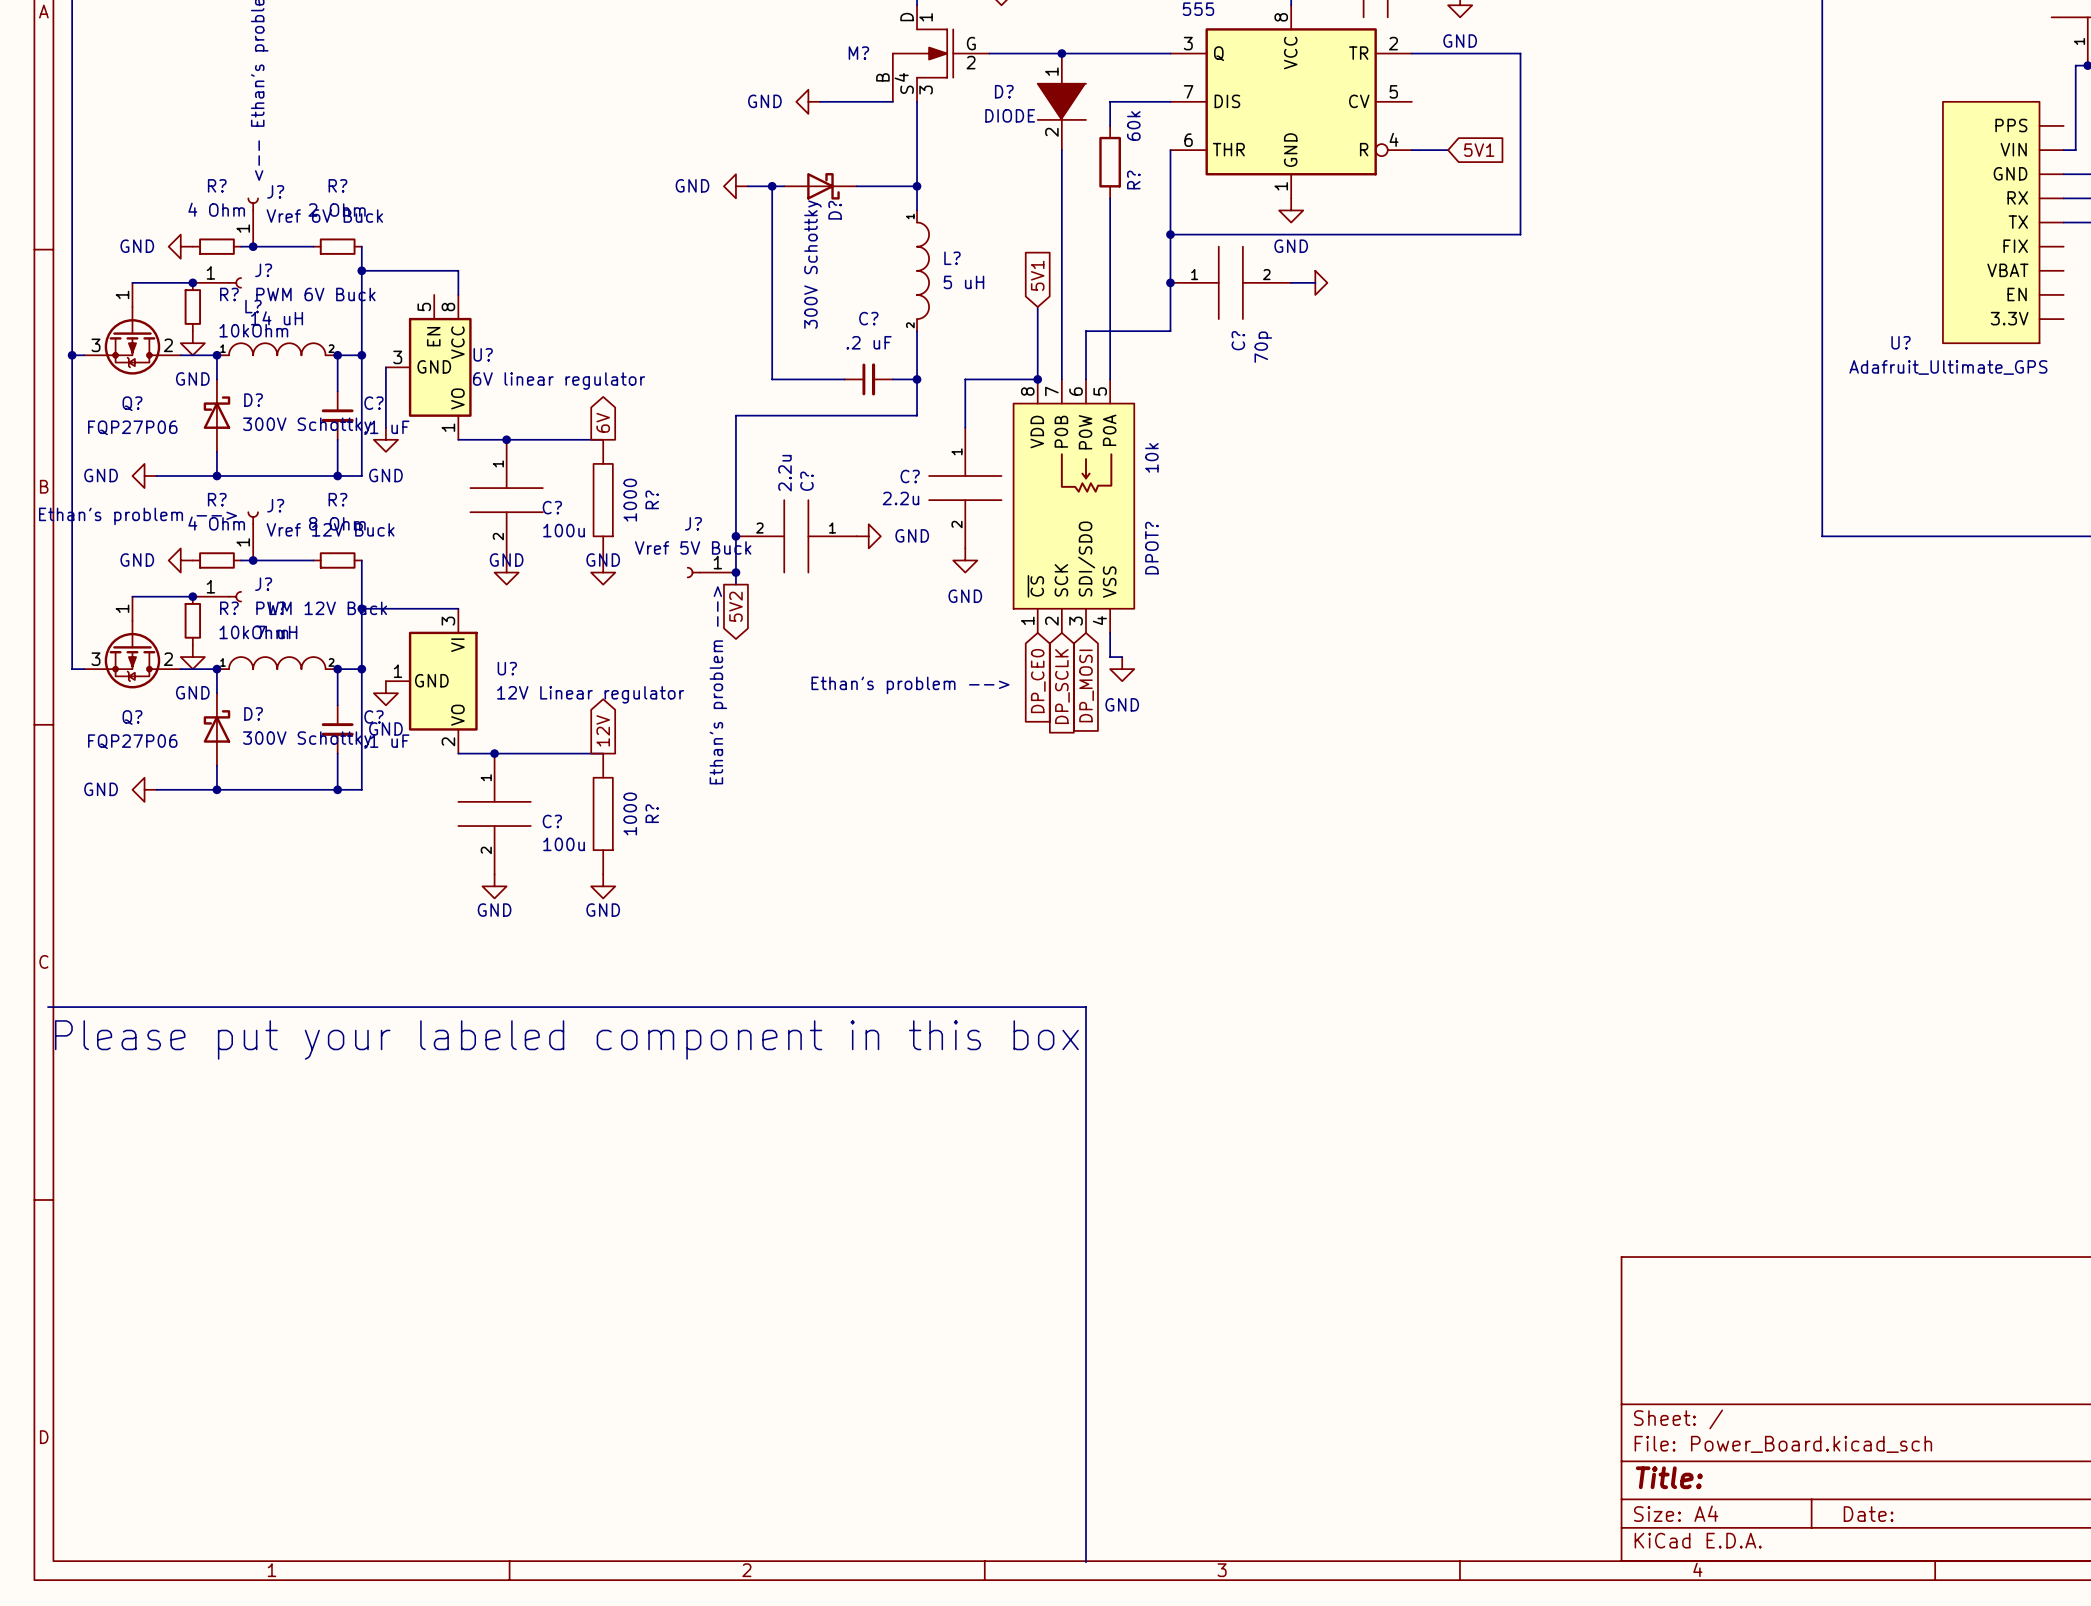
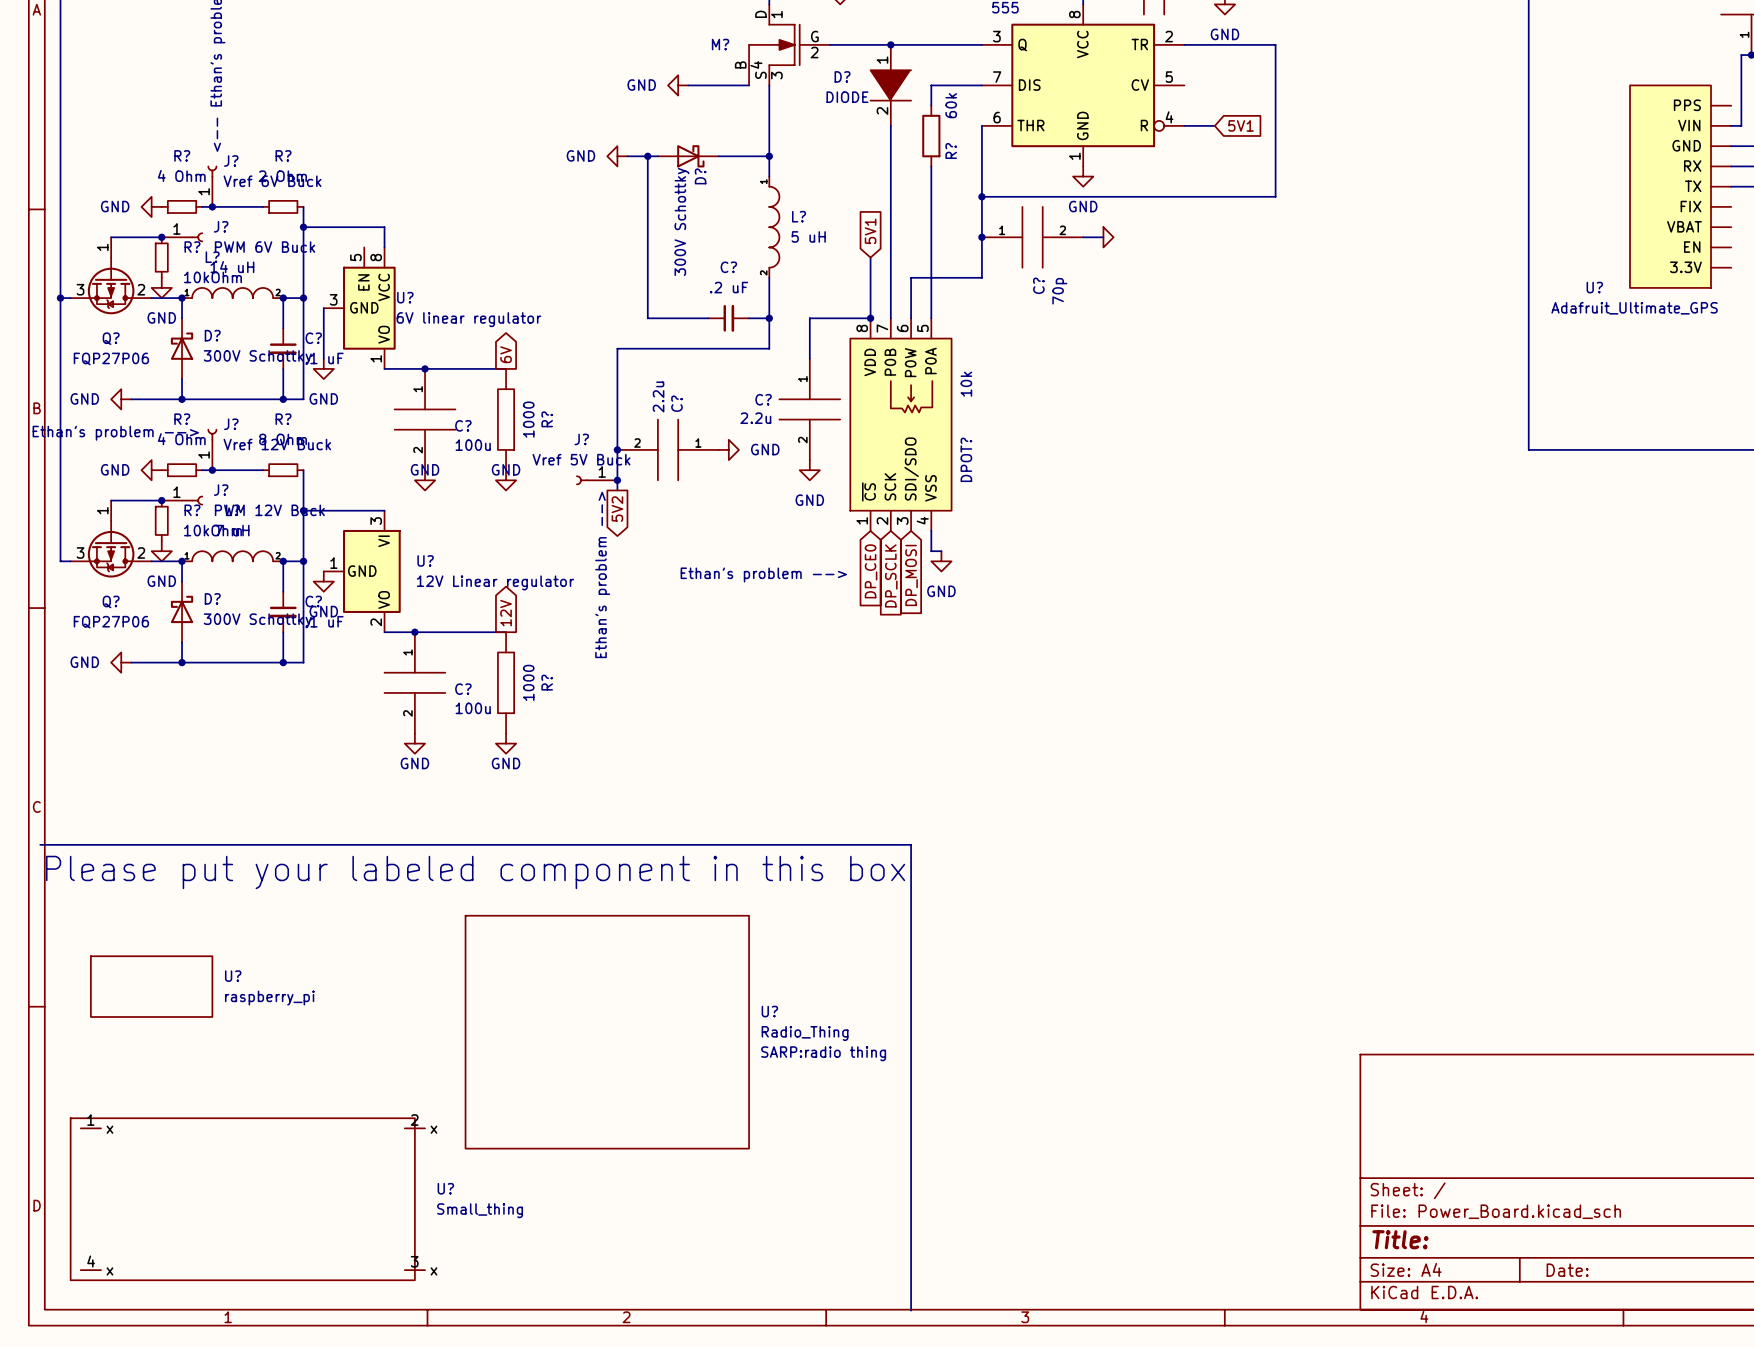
U?: none -> raspberry_pi (151, 986)
U?: none -> Radio_Thing (607, 1032)
U?: none -> Small_thing (247, 1199)

